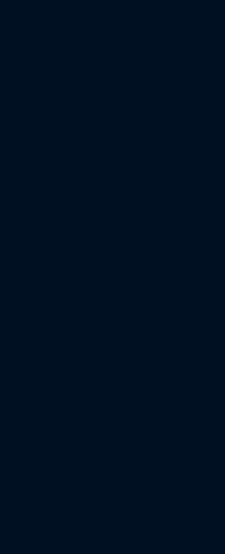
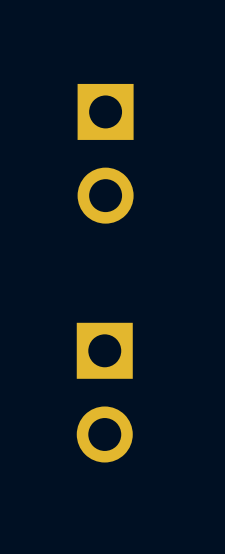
part: none -> (105, 153)
part: none -> (104, 392)

